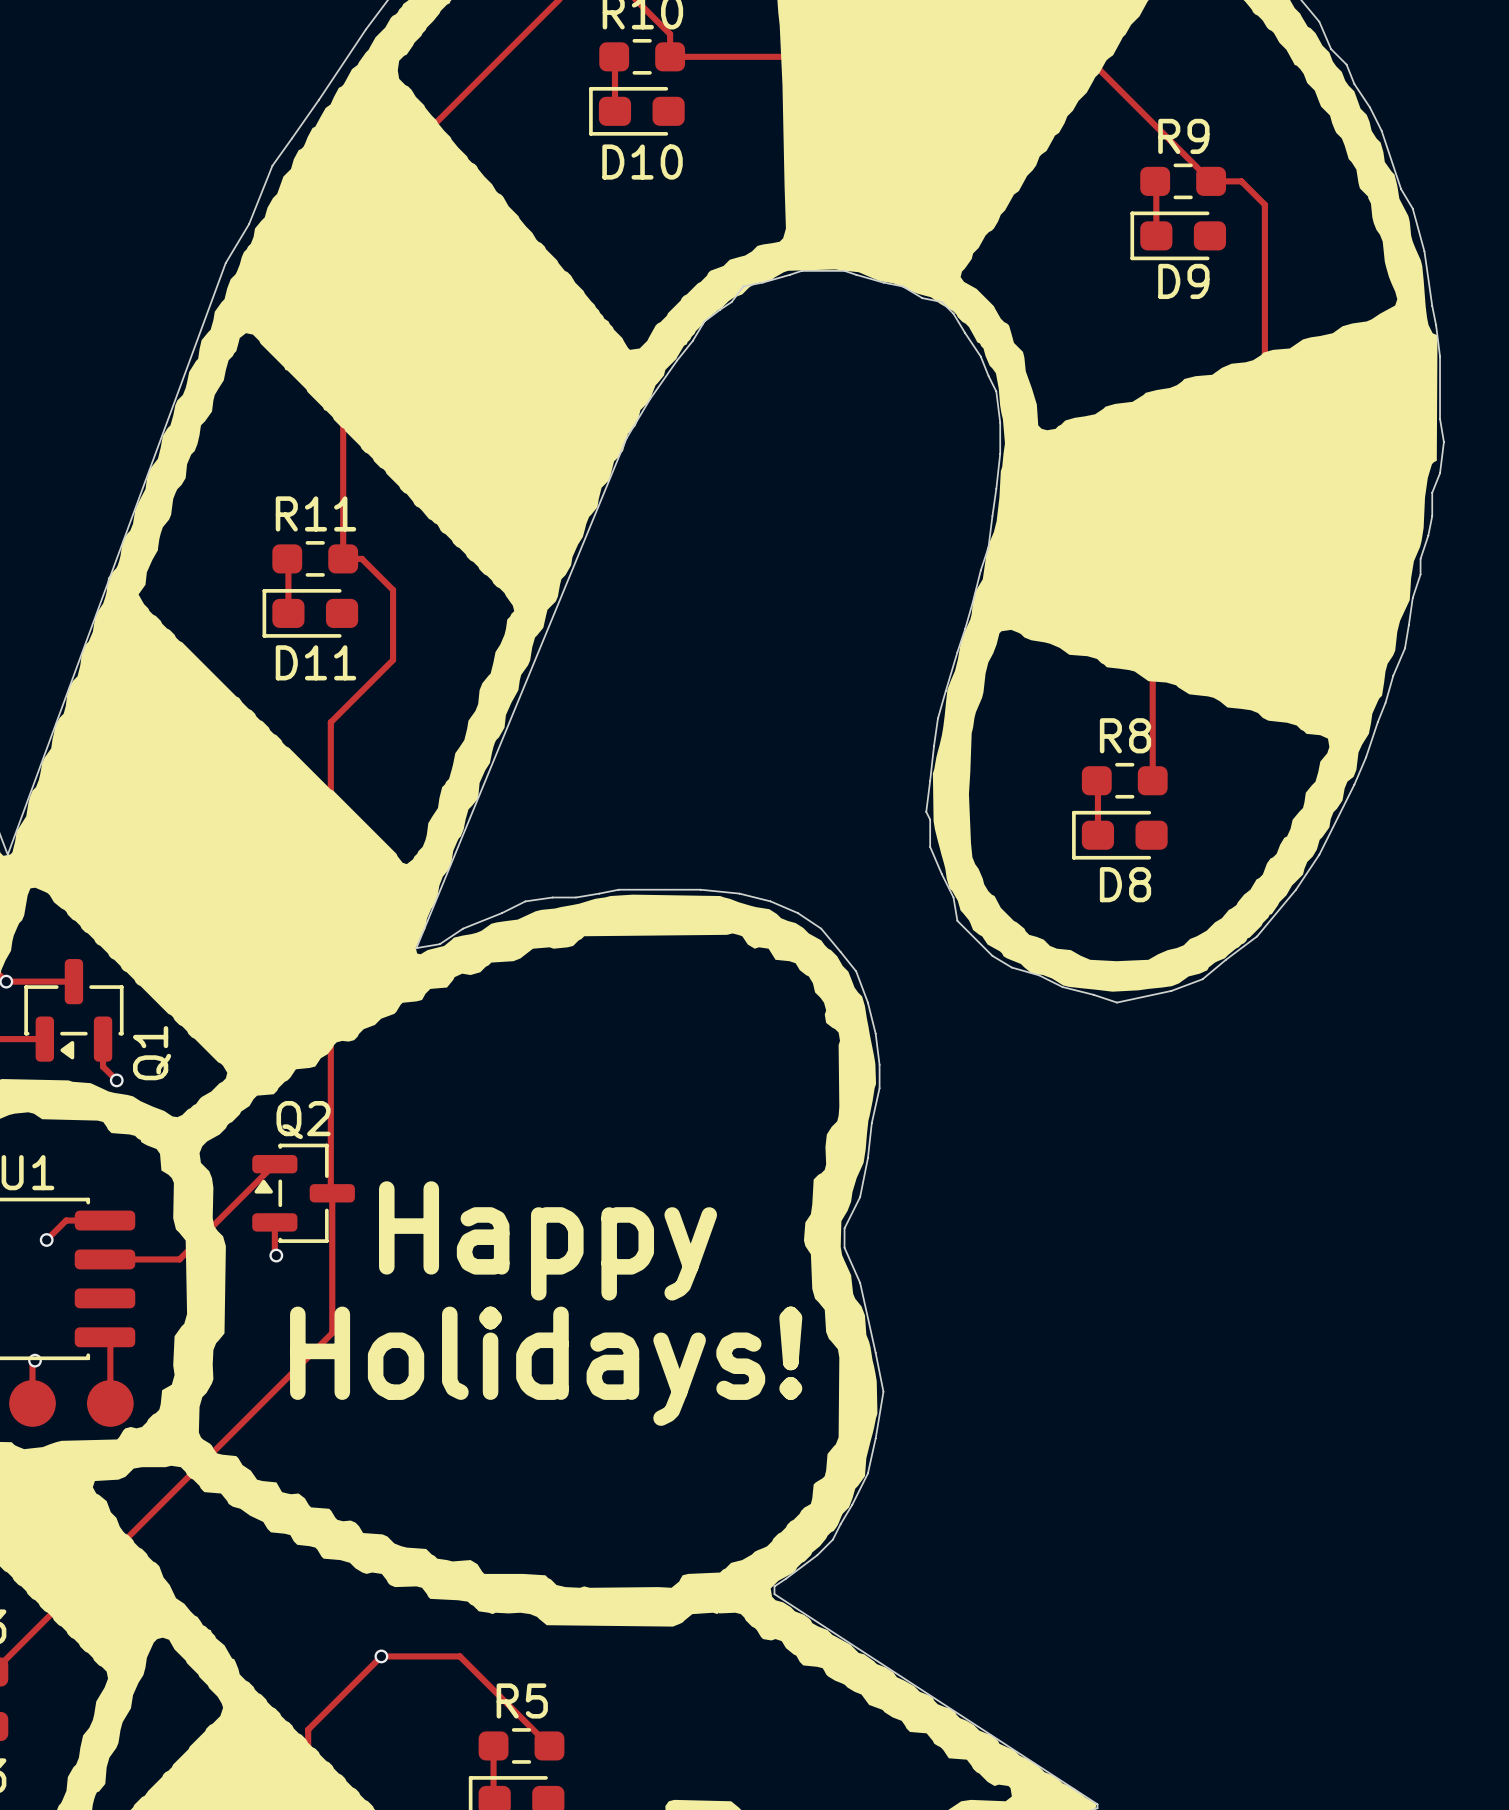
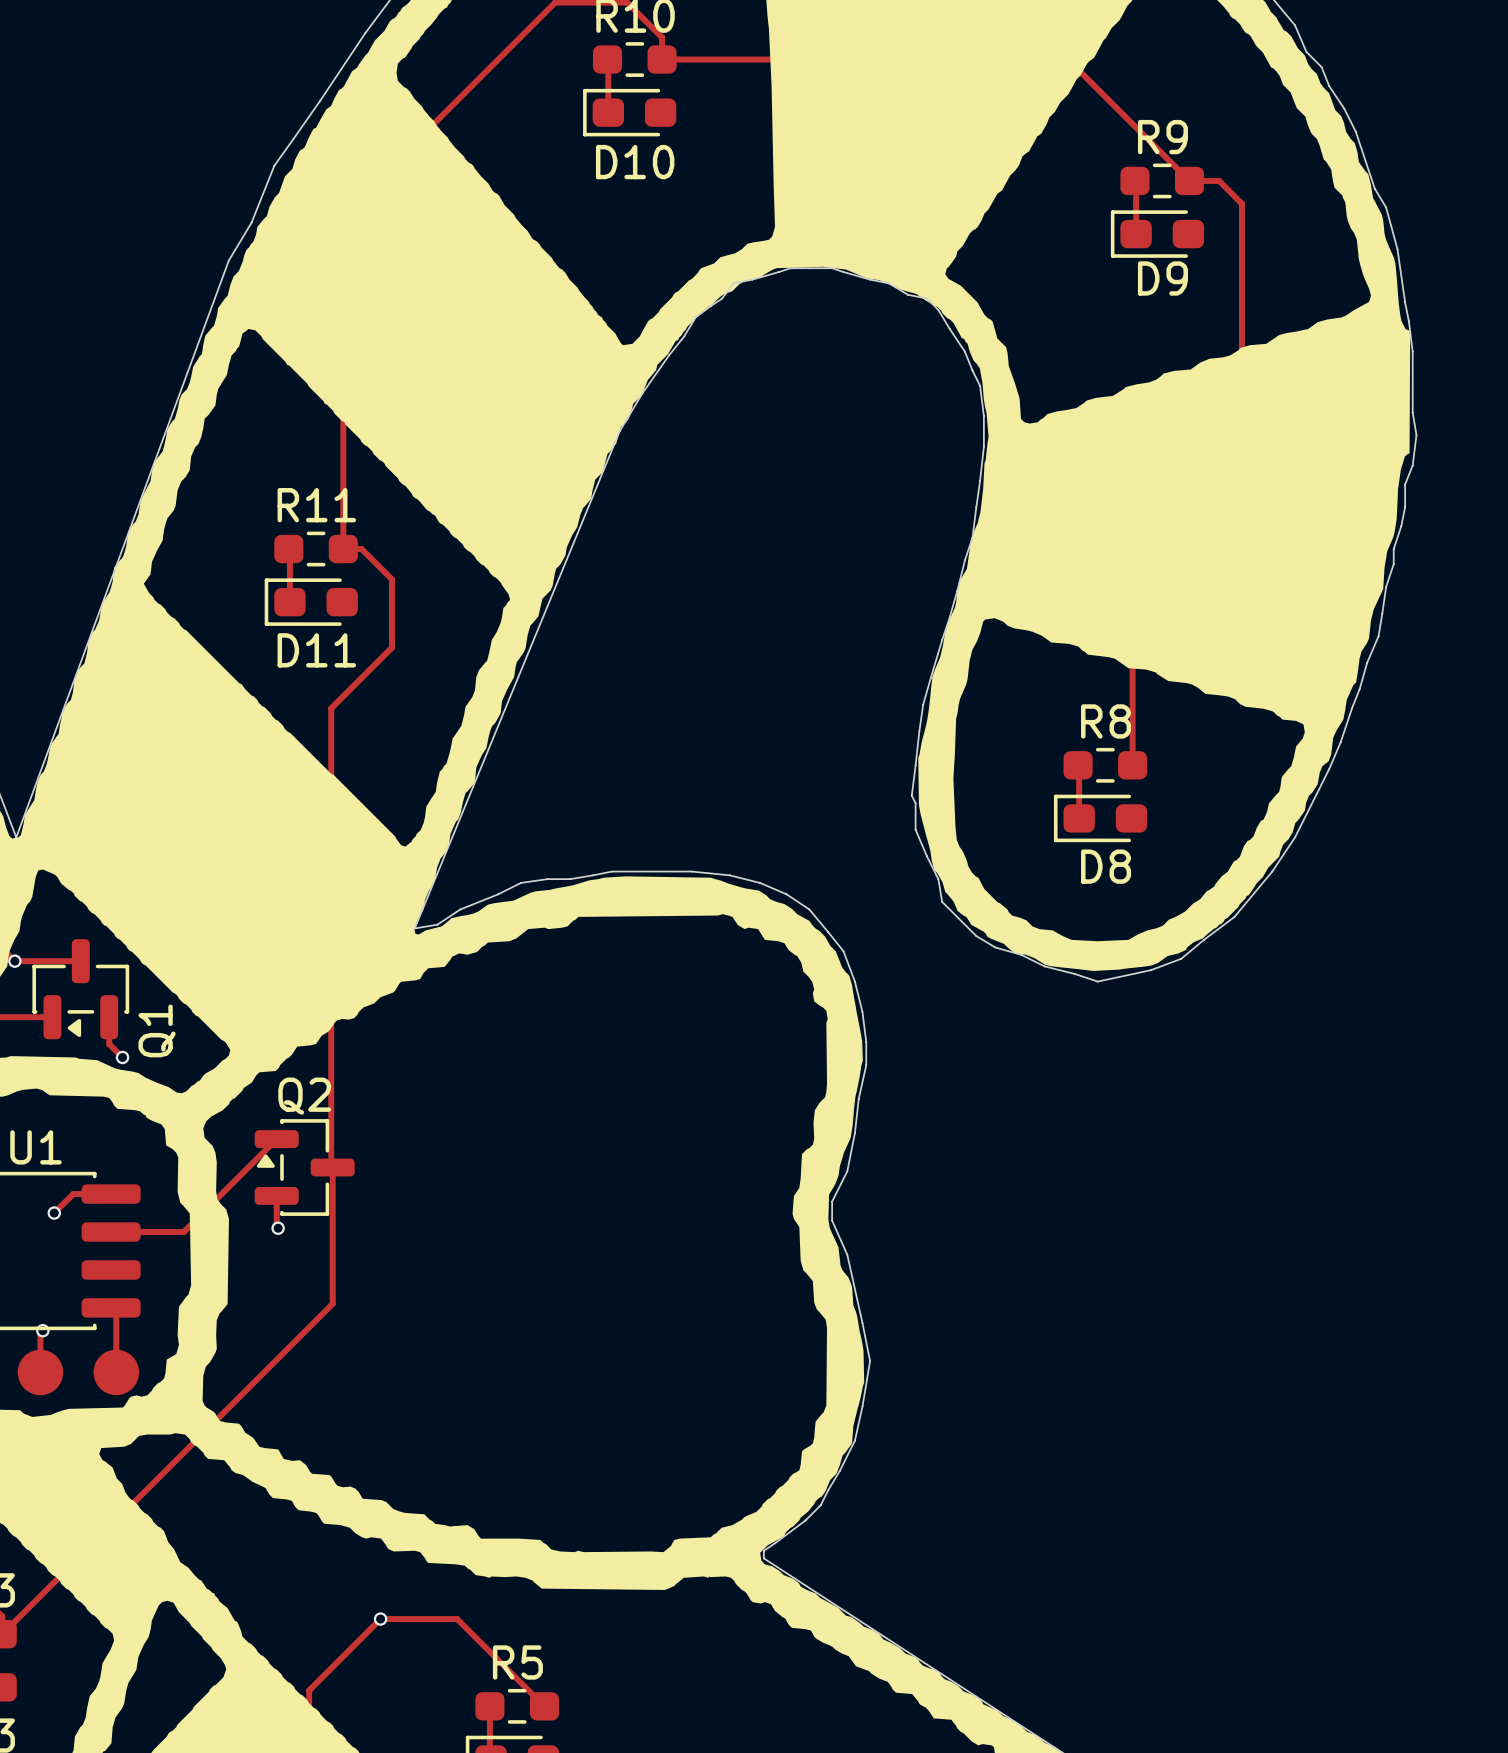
text: Happy (548, 1240) -> none
text: Holidays! (546, 1366) -> none

